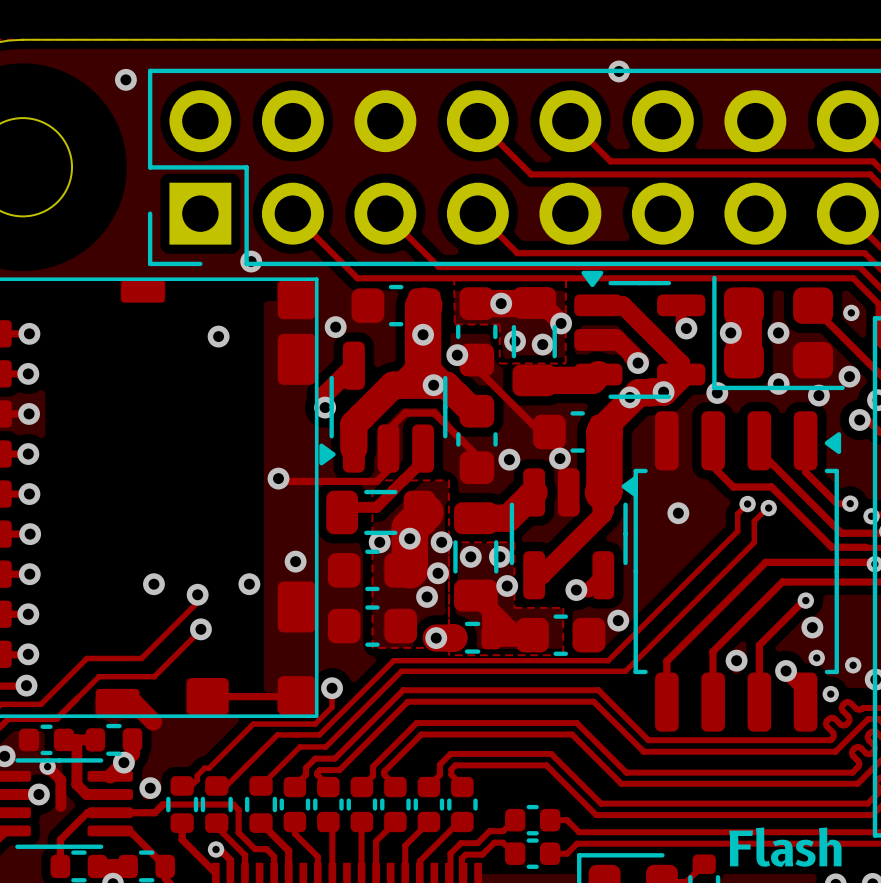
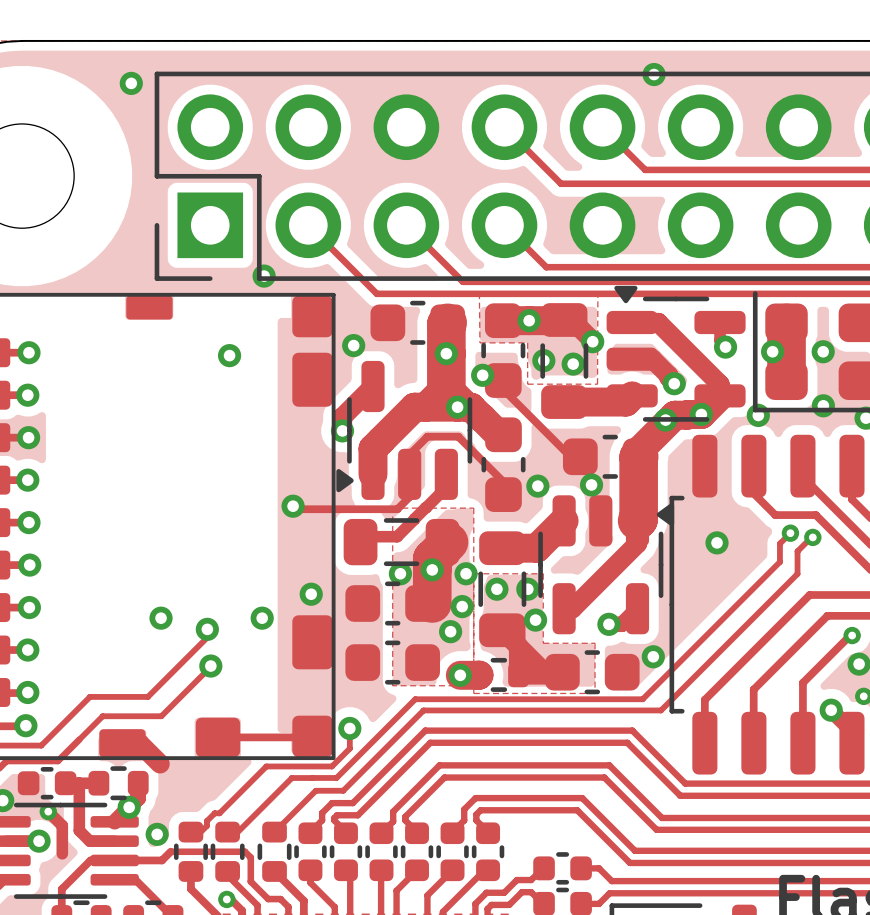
via: (736, 660) -> none

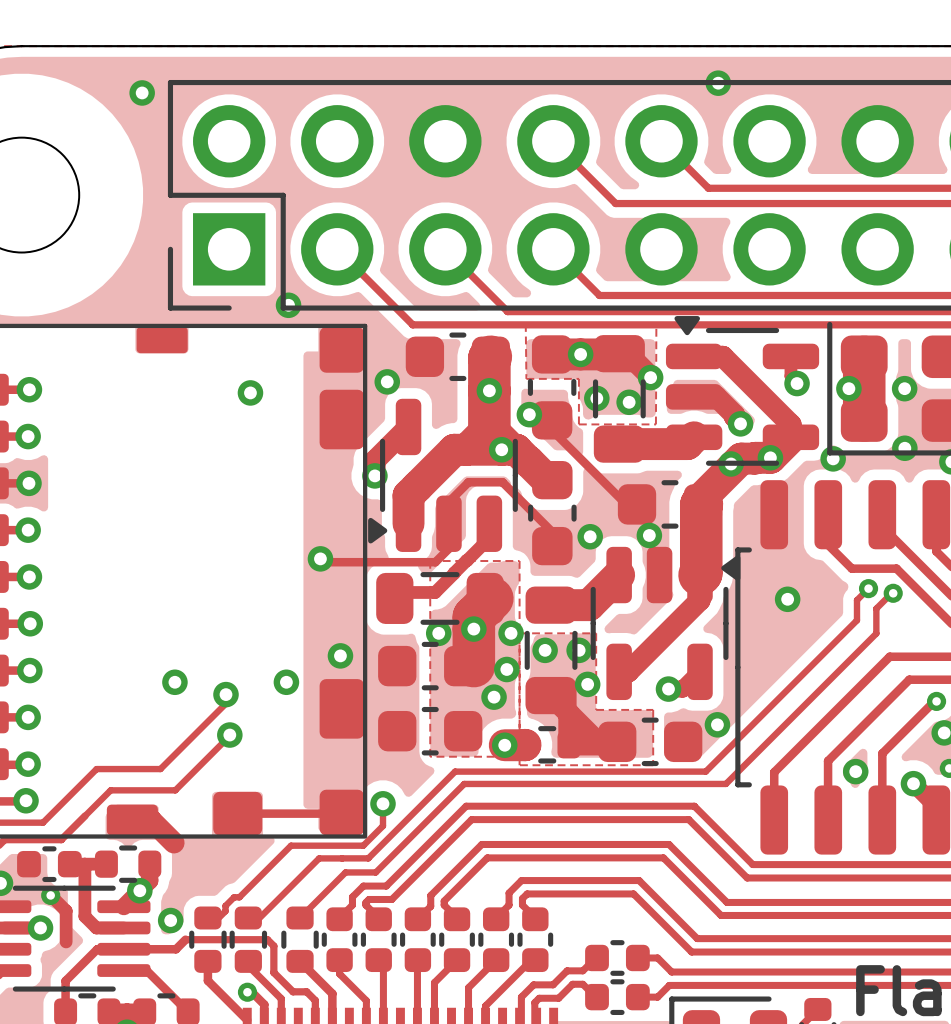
via: none -> (855, 771)

